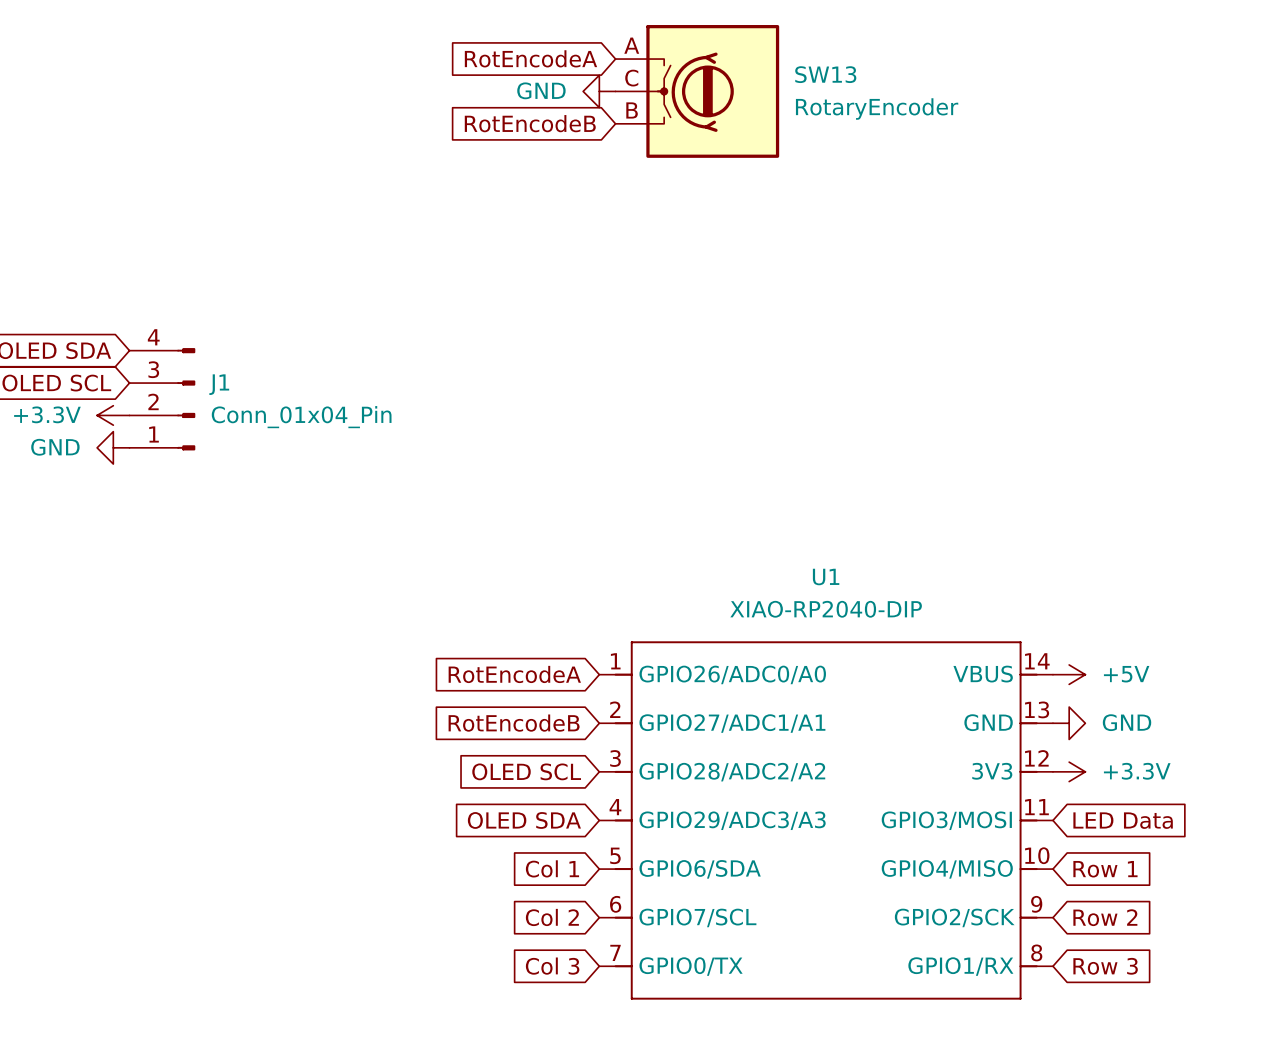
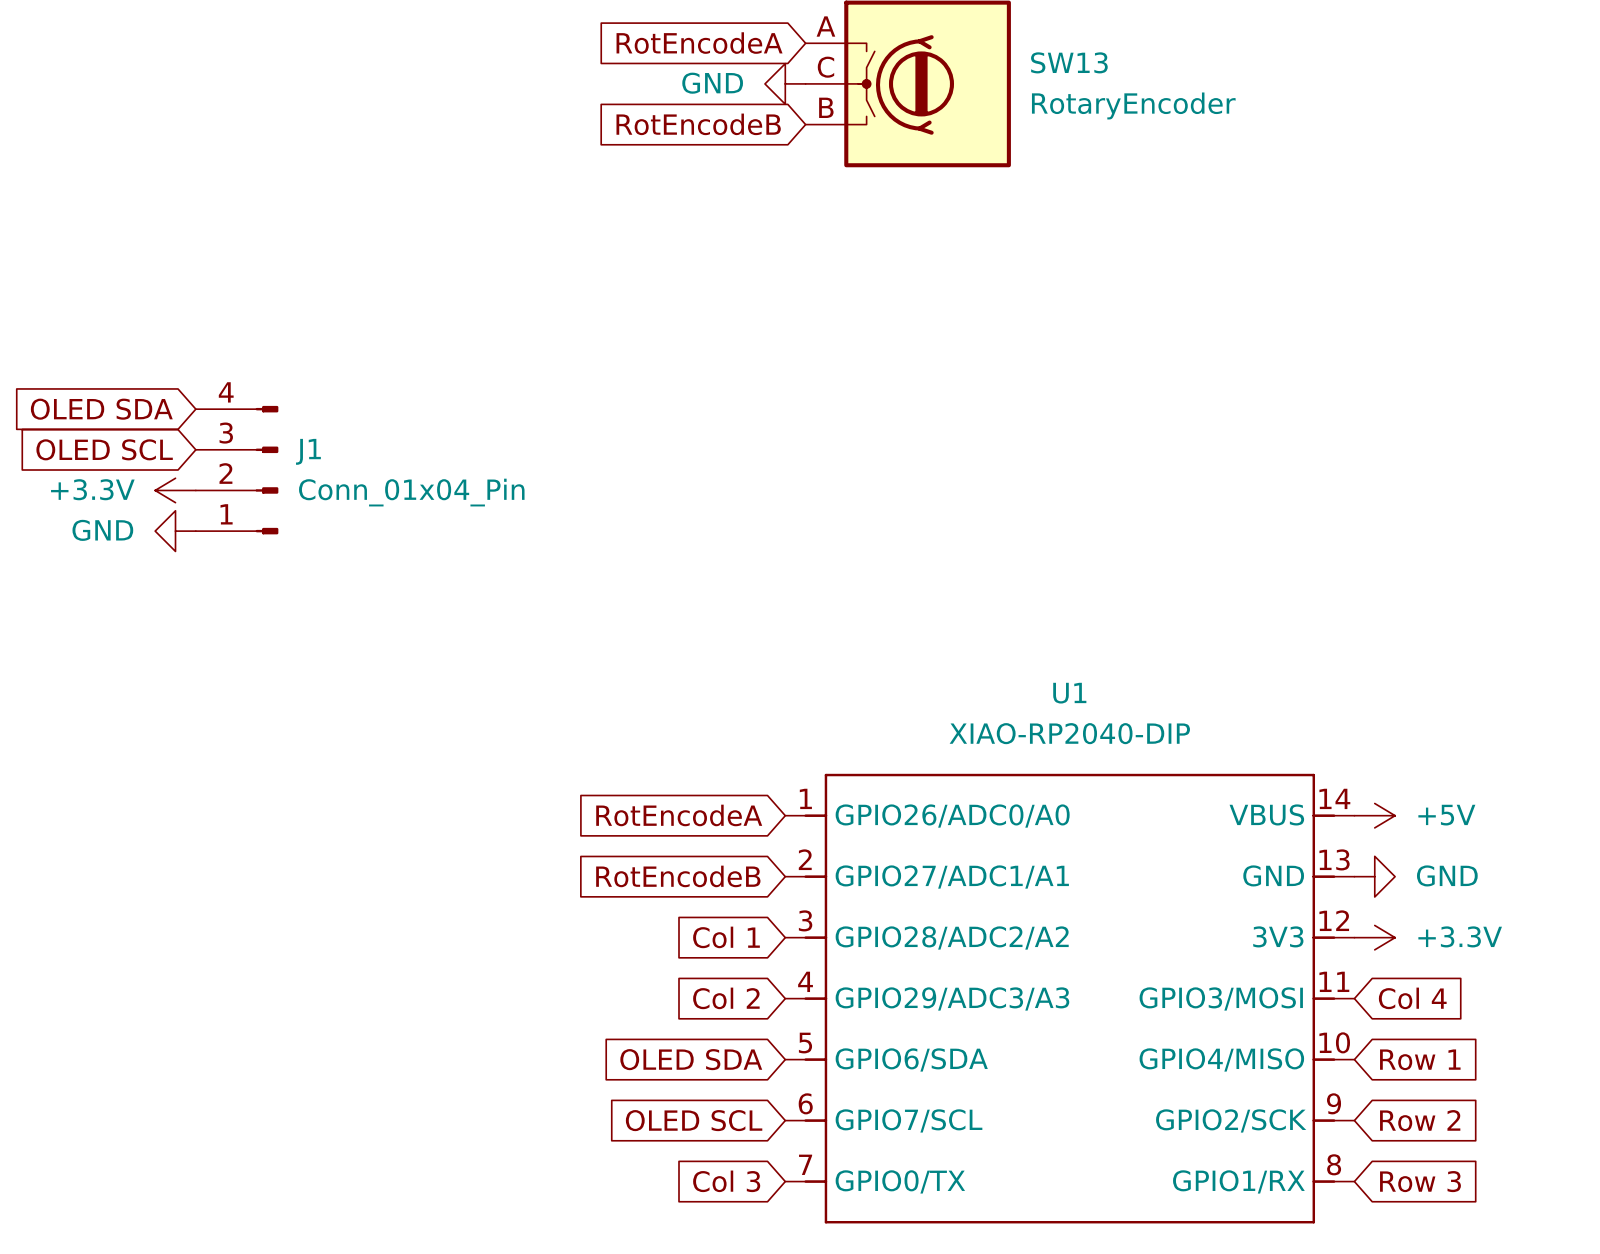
global label: OLED SCL (526, 771) -> Col 1 (726, 937)
global label: OLED SDA (524, 820) -> Col 2 (726, 998)
global label: LED Data (1123, 820) -> Col 4 (1412, 998)
global label: Col 1 (552, 868) -> OLED SDA (691, 1059)
global label: Col 2 (552, 917) -> OLED SCL (694, 1120)

